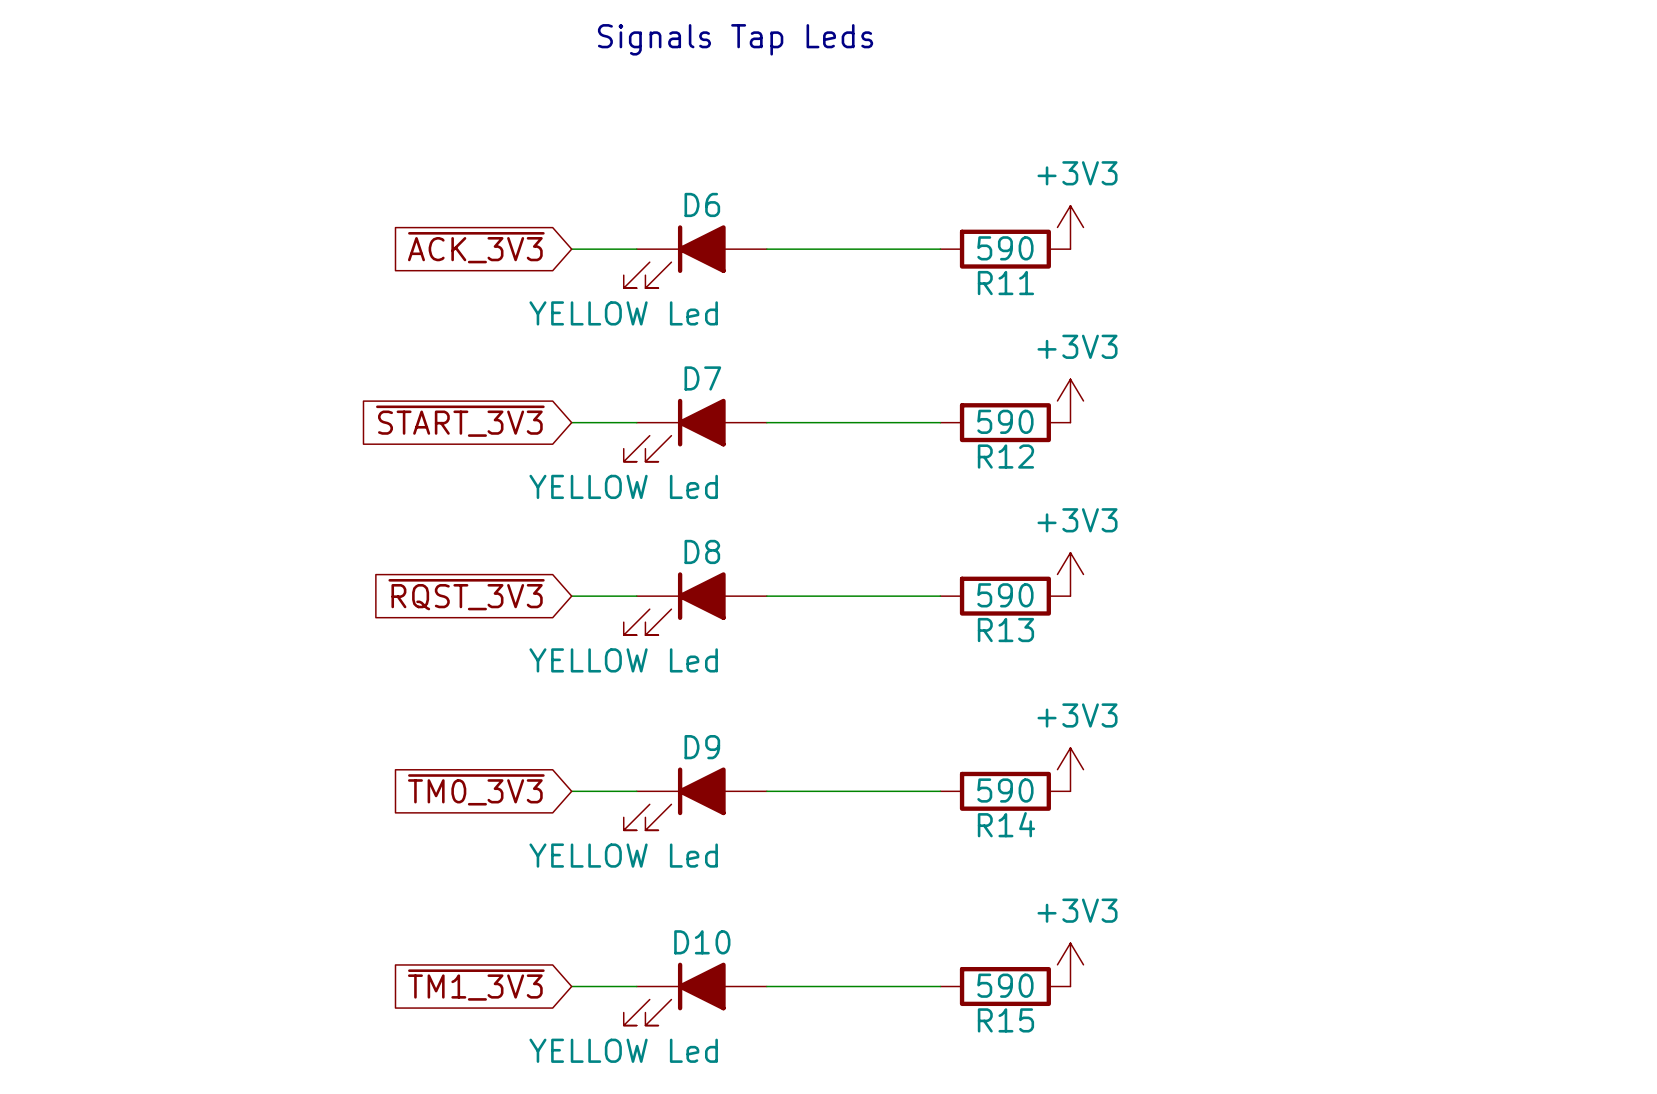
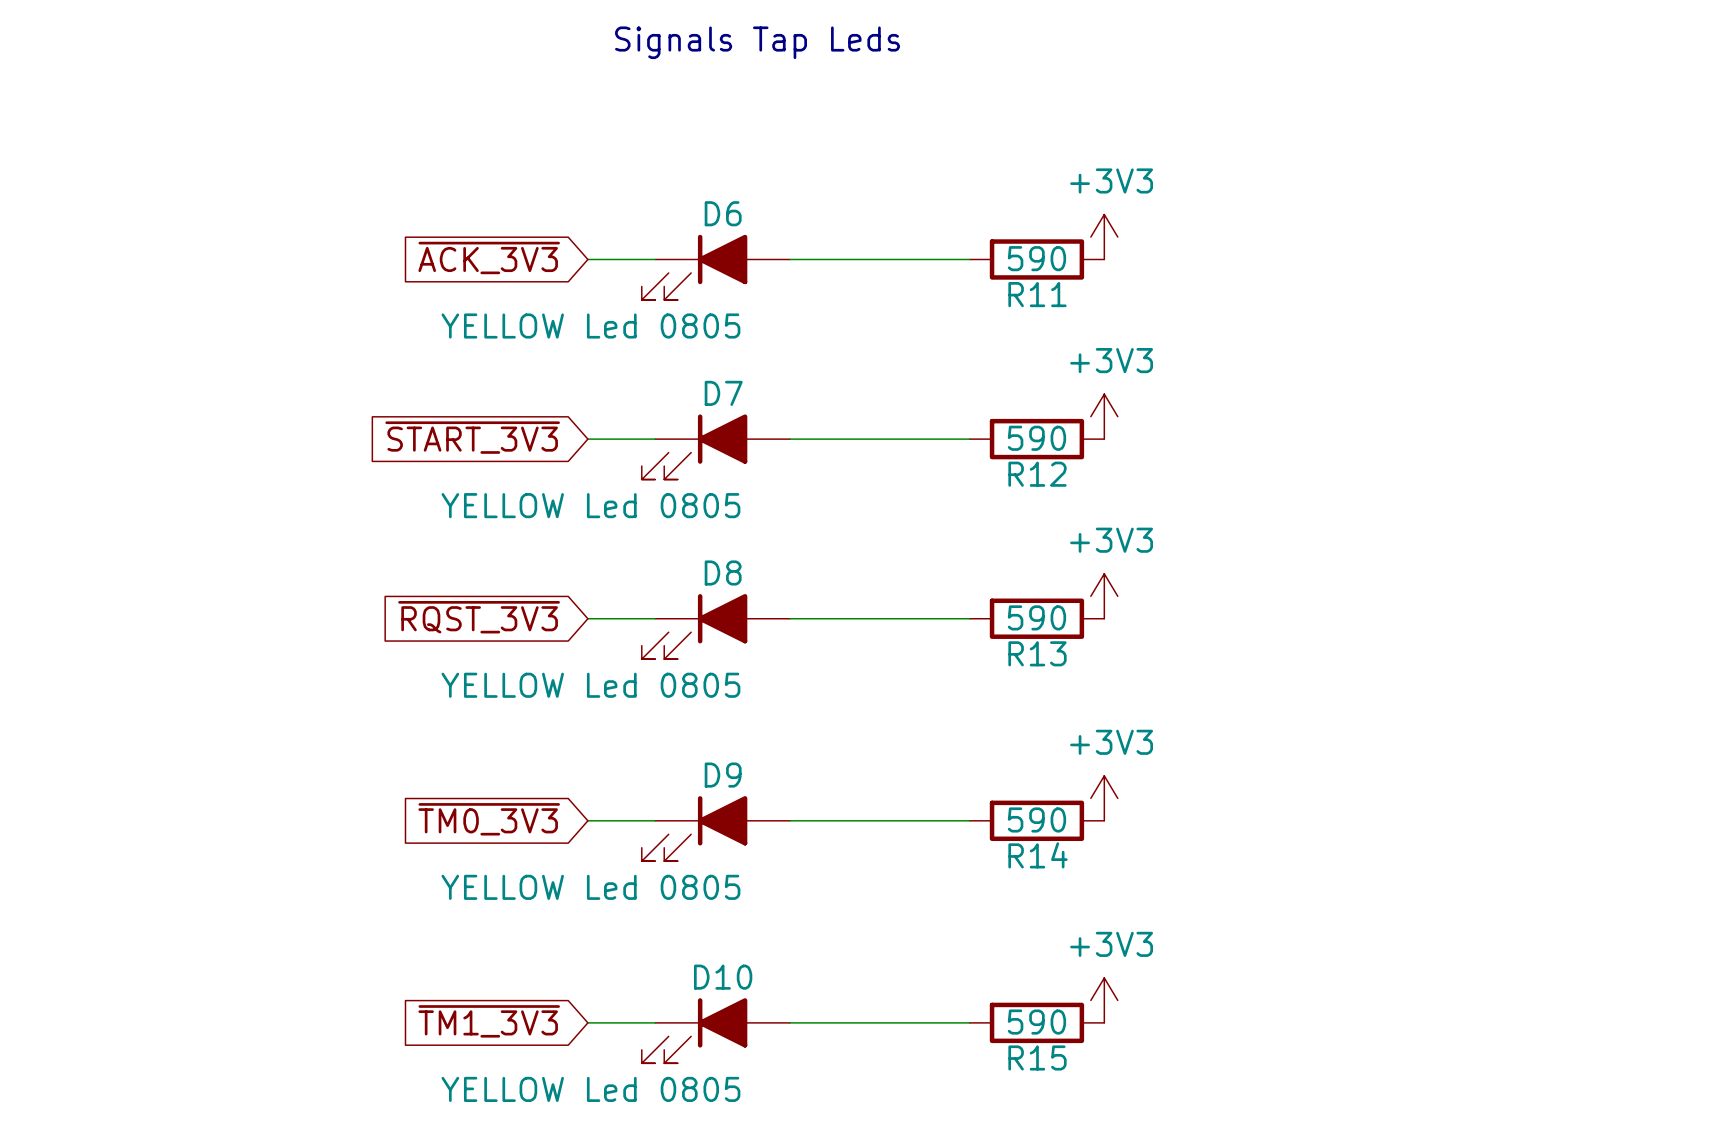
D6 value: YELLOW Led (623, 313) -> YELLOW Led 0805 (590, 326)
D7 value: YELLOW Led (623, 486) -> YELLOW Led 0805 (590, 505)
D8 value: YELLOW Led (623, 660) -> YELLOW Led 0805 (590, 685)
D9 value: YELLOW Led (623, 855) -> YELLOW Led 0805 (590, 887)
D10 value: YELLOW Led (623, 1050) -> YELLOW Led 0805 (590, 1089)

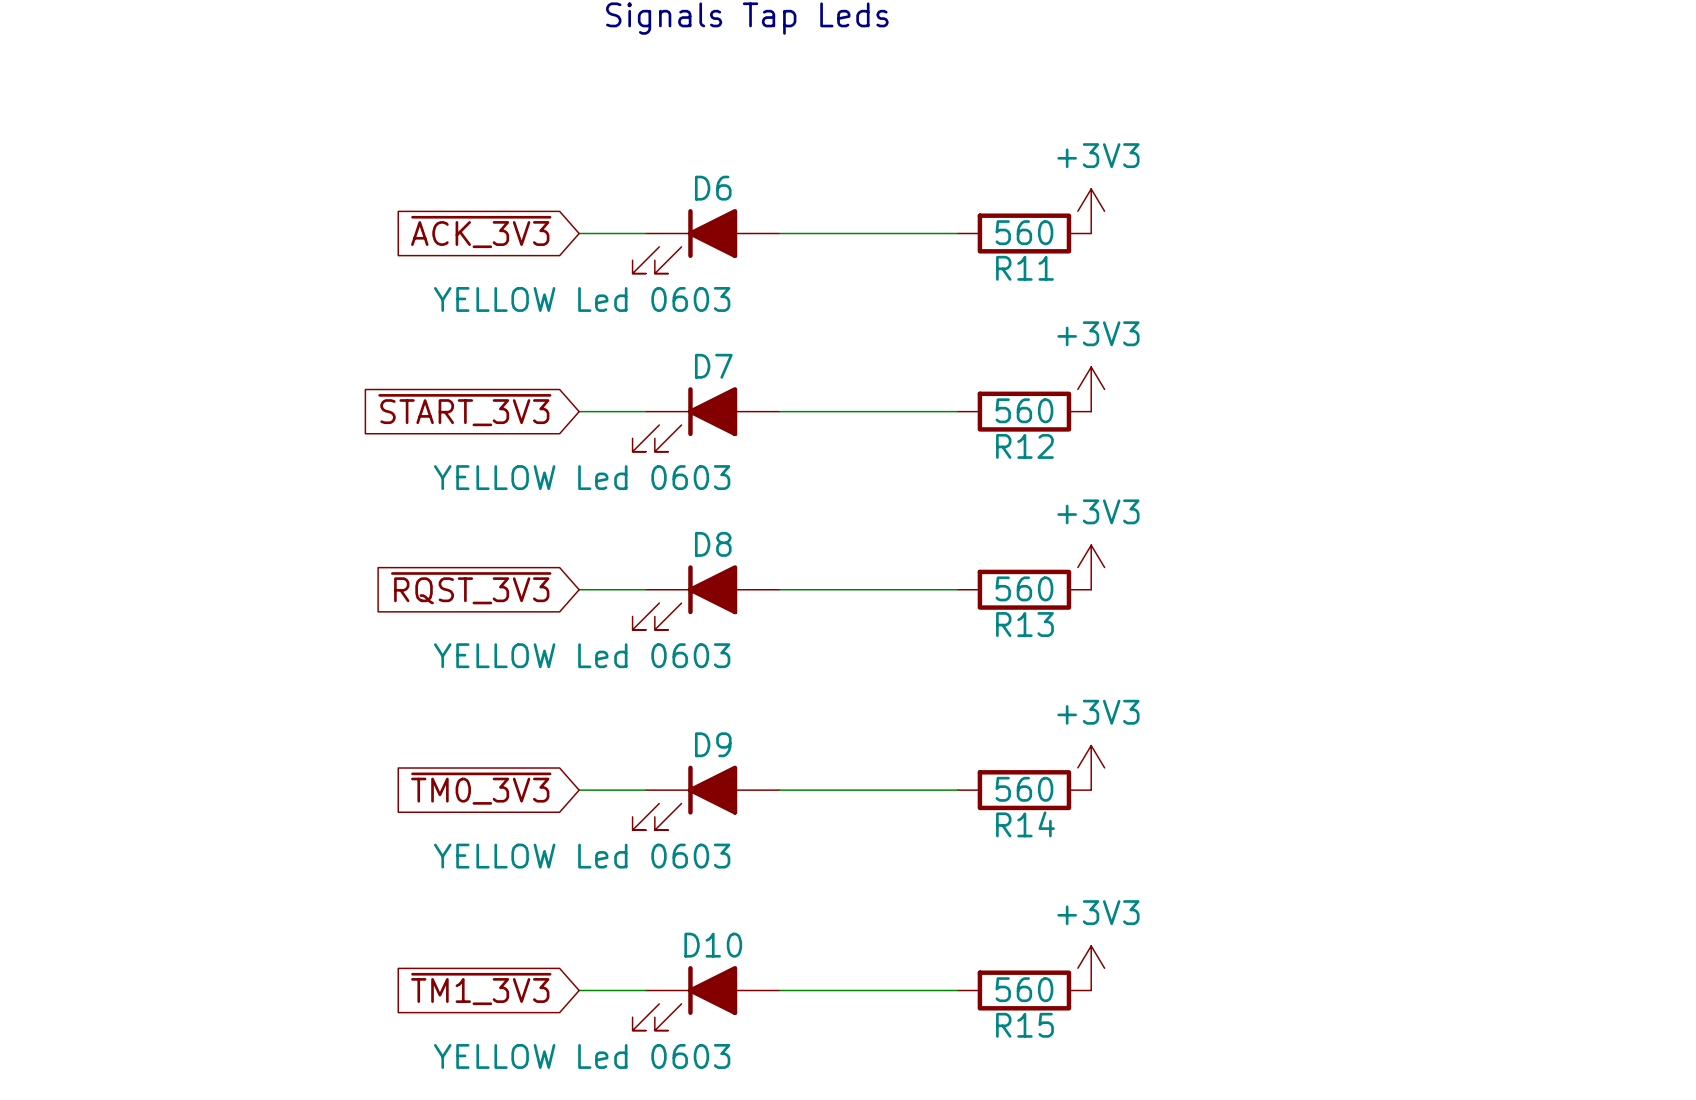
R11 value: 590 (1036, 258) -> 560 (1024, 232)
D6 value: YELLOW Led 0805 (590, 326) -> YELLOW Led 0603 (582, 299)
R12 value: 590 (1036, 438) -> 560 (1024, 410)
D7 value: YELLOW Led 0805 (590, 505) -> YELLOW Led 0603 (582, 477)
R13 value: 590 (1036, 617) -> 560 (1024, 588)
D8 value: YELLOW Led 0805 (590, 685) -> YELLOW Led 0603 (582, 655)
R14 value: 590 (1036, 819) -> 560 (1024, 789)
D9 value: YELLOW Led 0805 (590, 887) -> YELLOW Led 0603 (582, 856)
R15 value: 590 (1036, 1022) -> 560 (1024, 989)
D10 value: YELLOW Led 0805 (590, 1089) -> YELLOW Led 0603 (582, 1056)

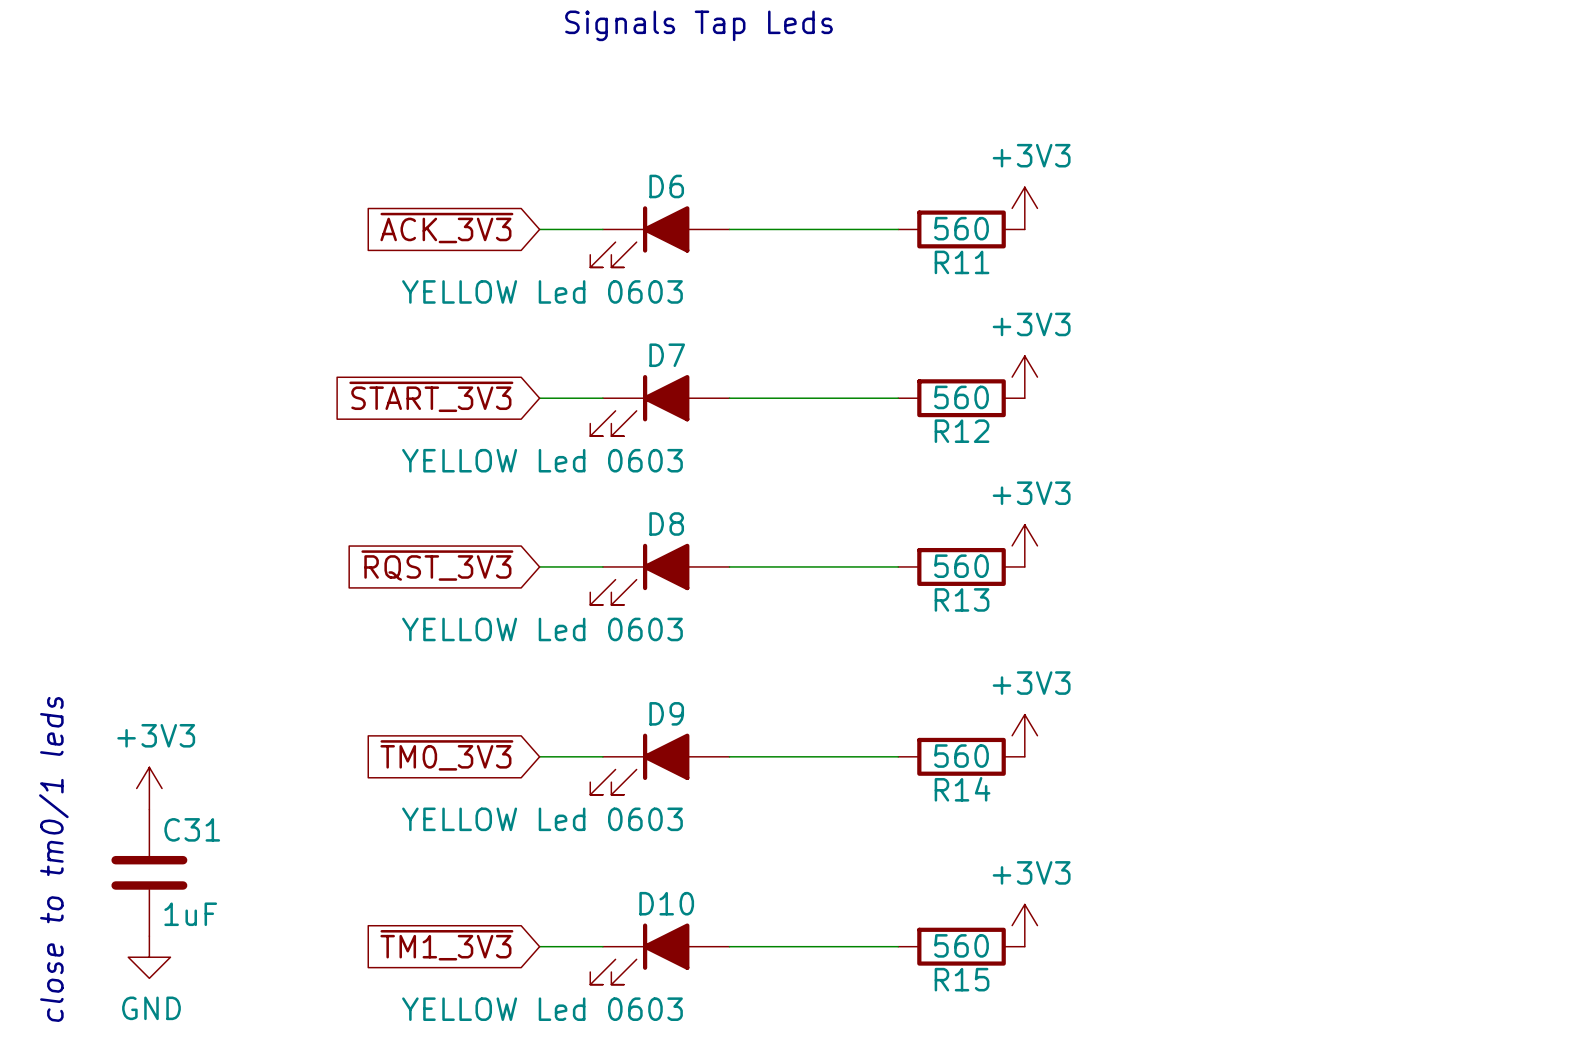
power symbol: none -> +3V3 (149, 788)
text: none -> close to tm0/1 leds (53, 859)
C31: none -> 1uF (149, 872)
power symbol: none -> GND (149, 957)

